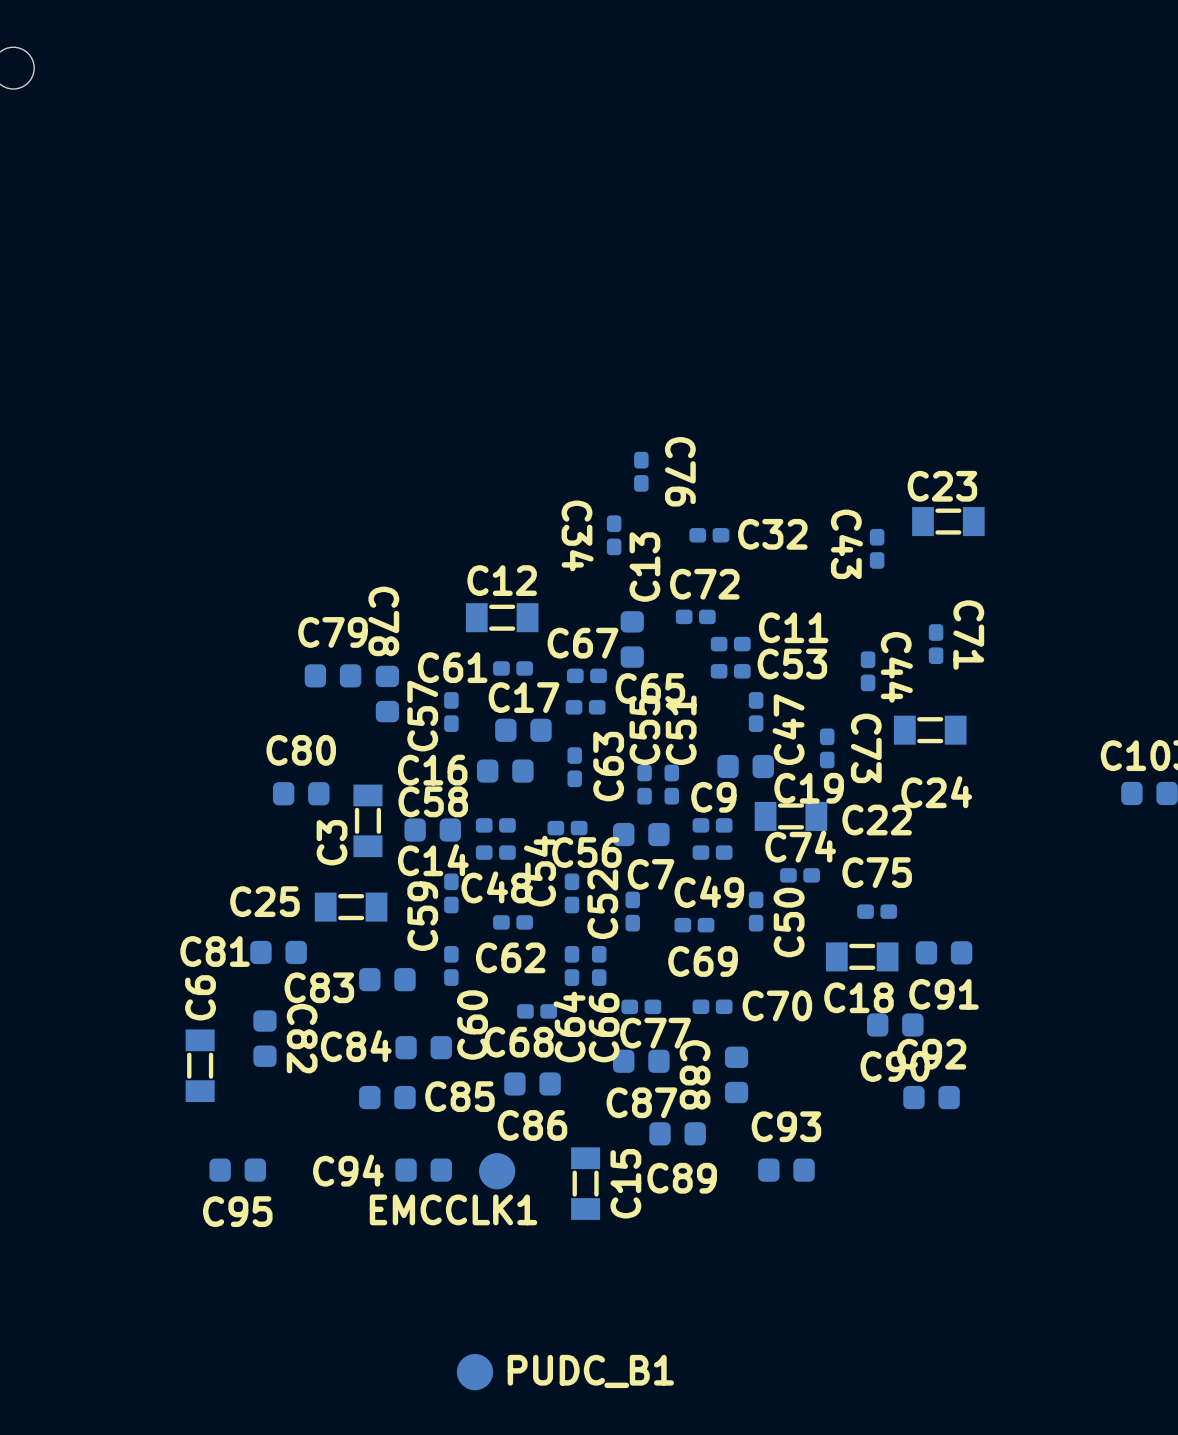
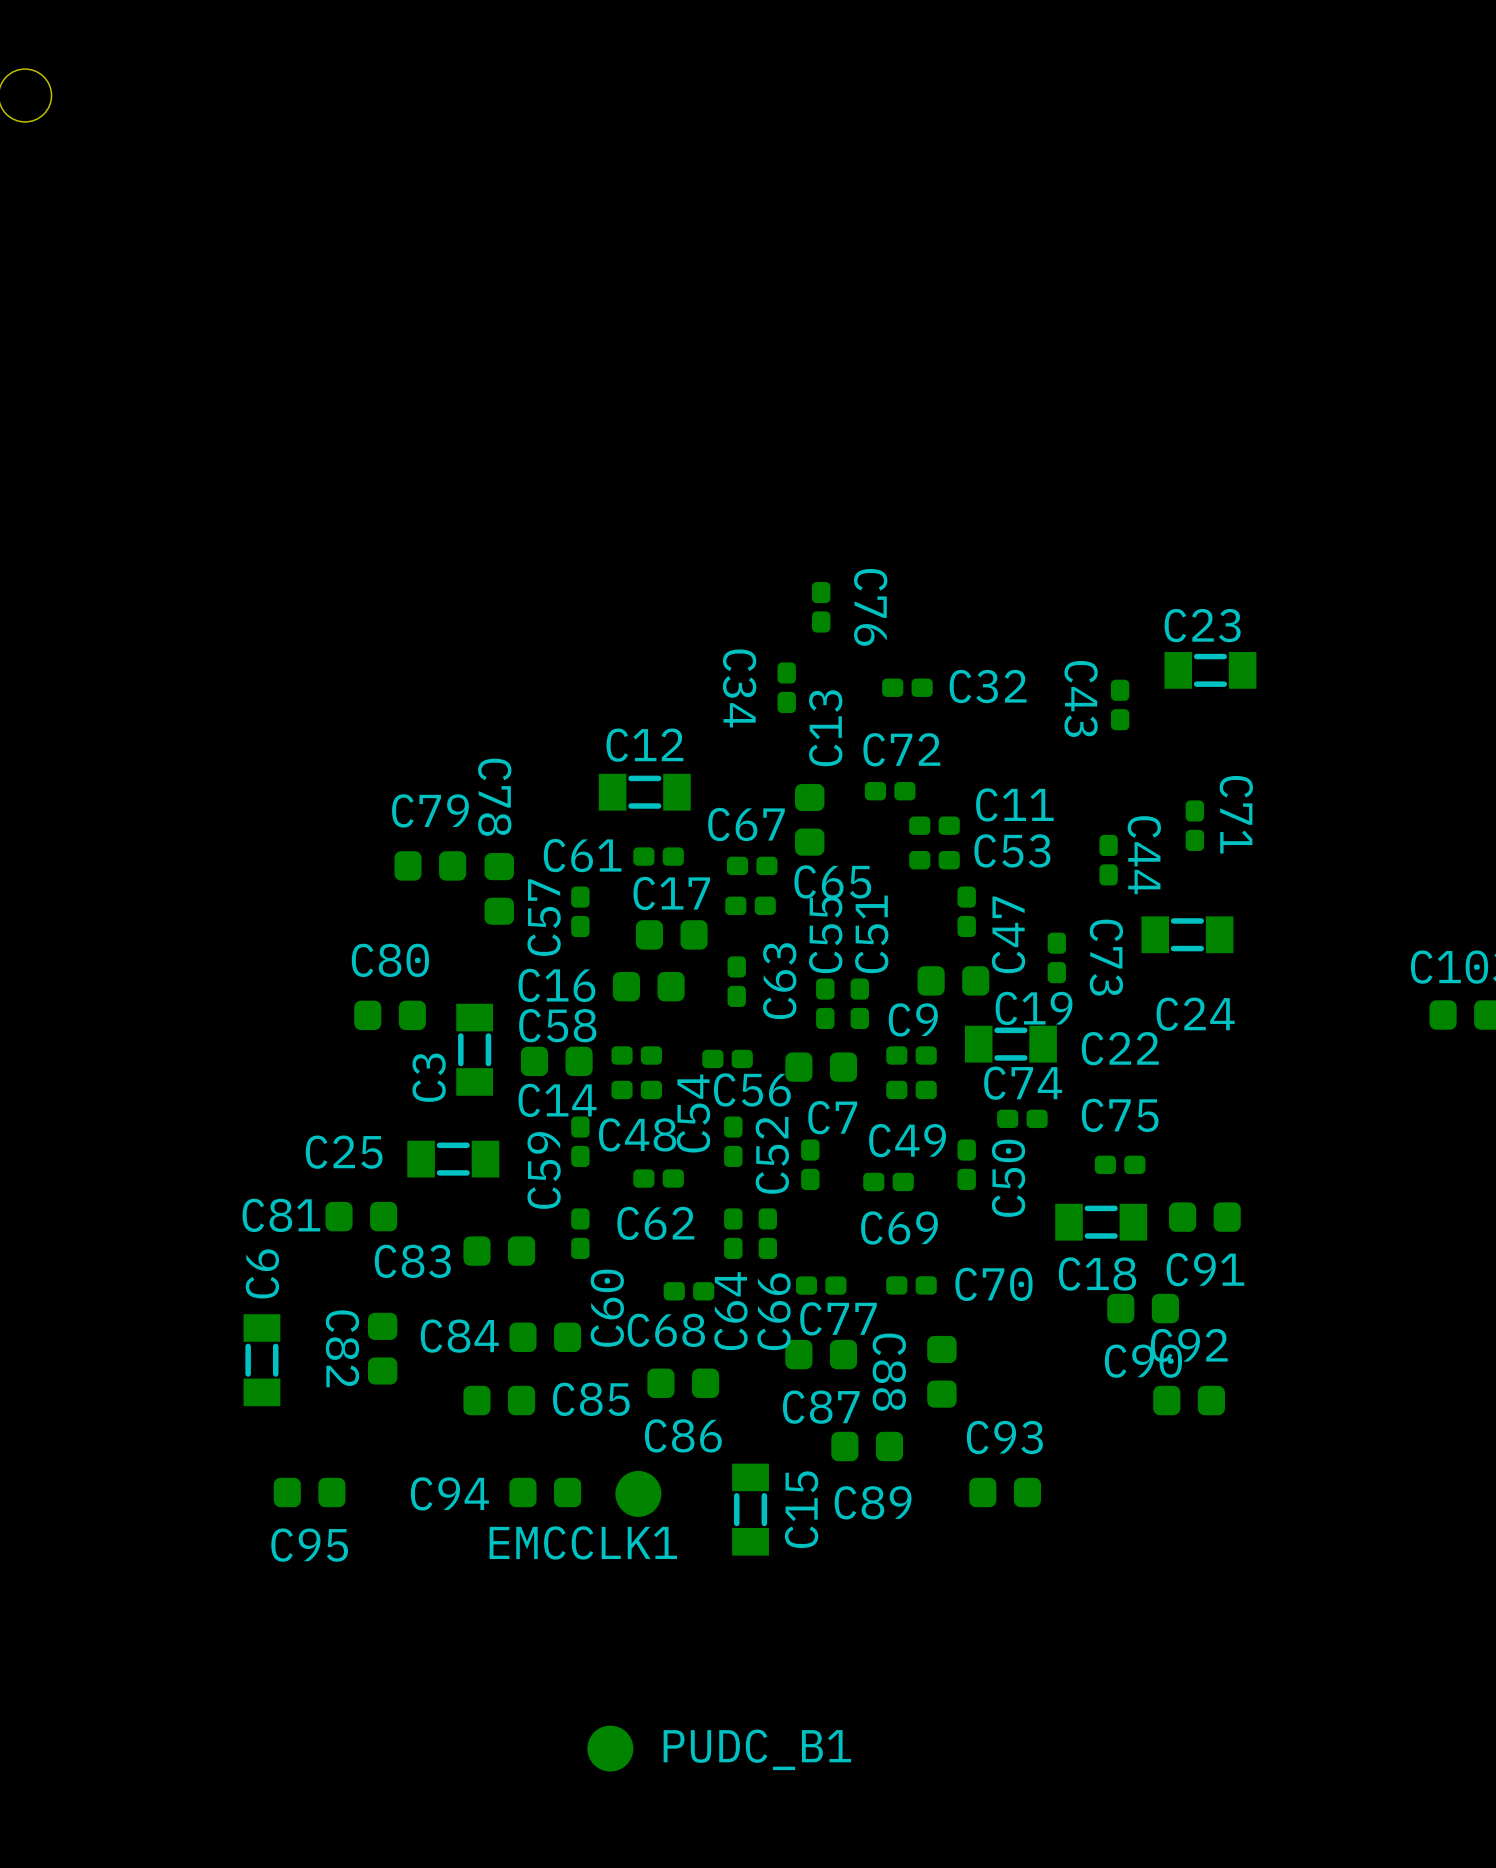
C82 position: (264, 1038) -> (382, 1348)
C82 name position: C82 (302, 1038) -> C82 (342, 1348)

